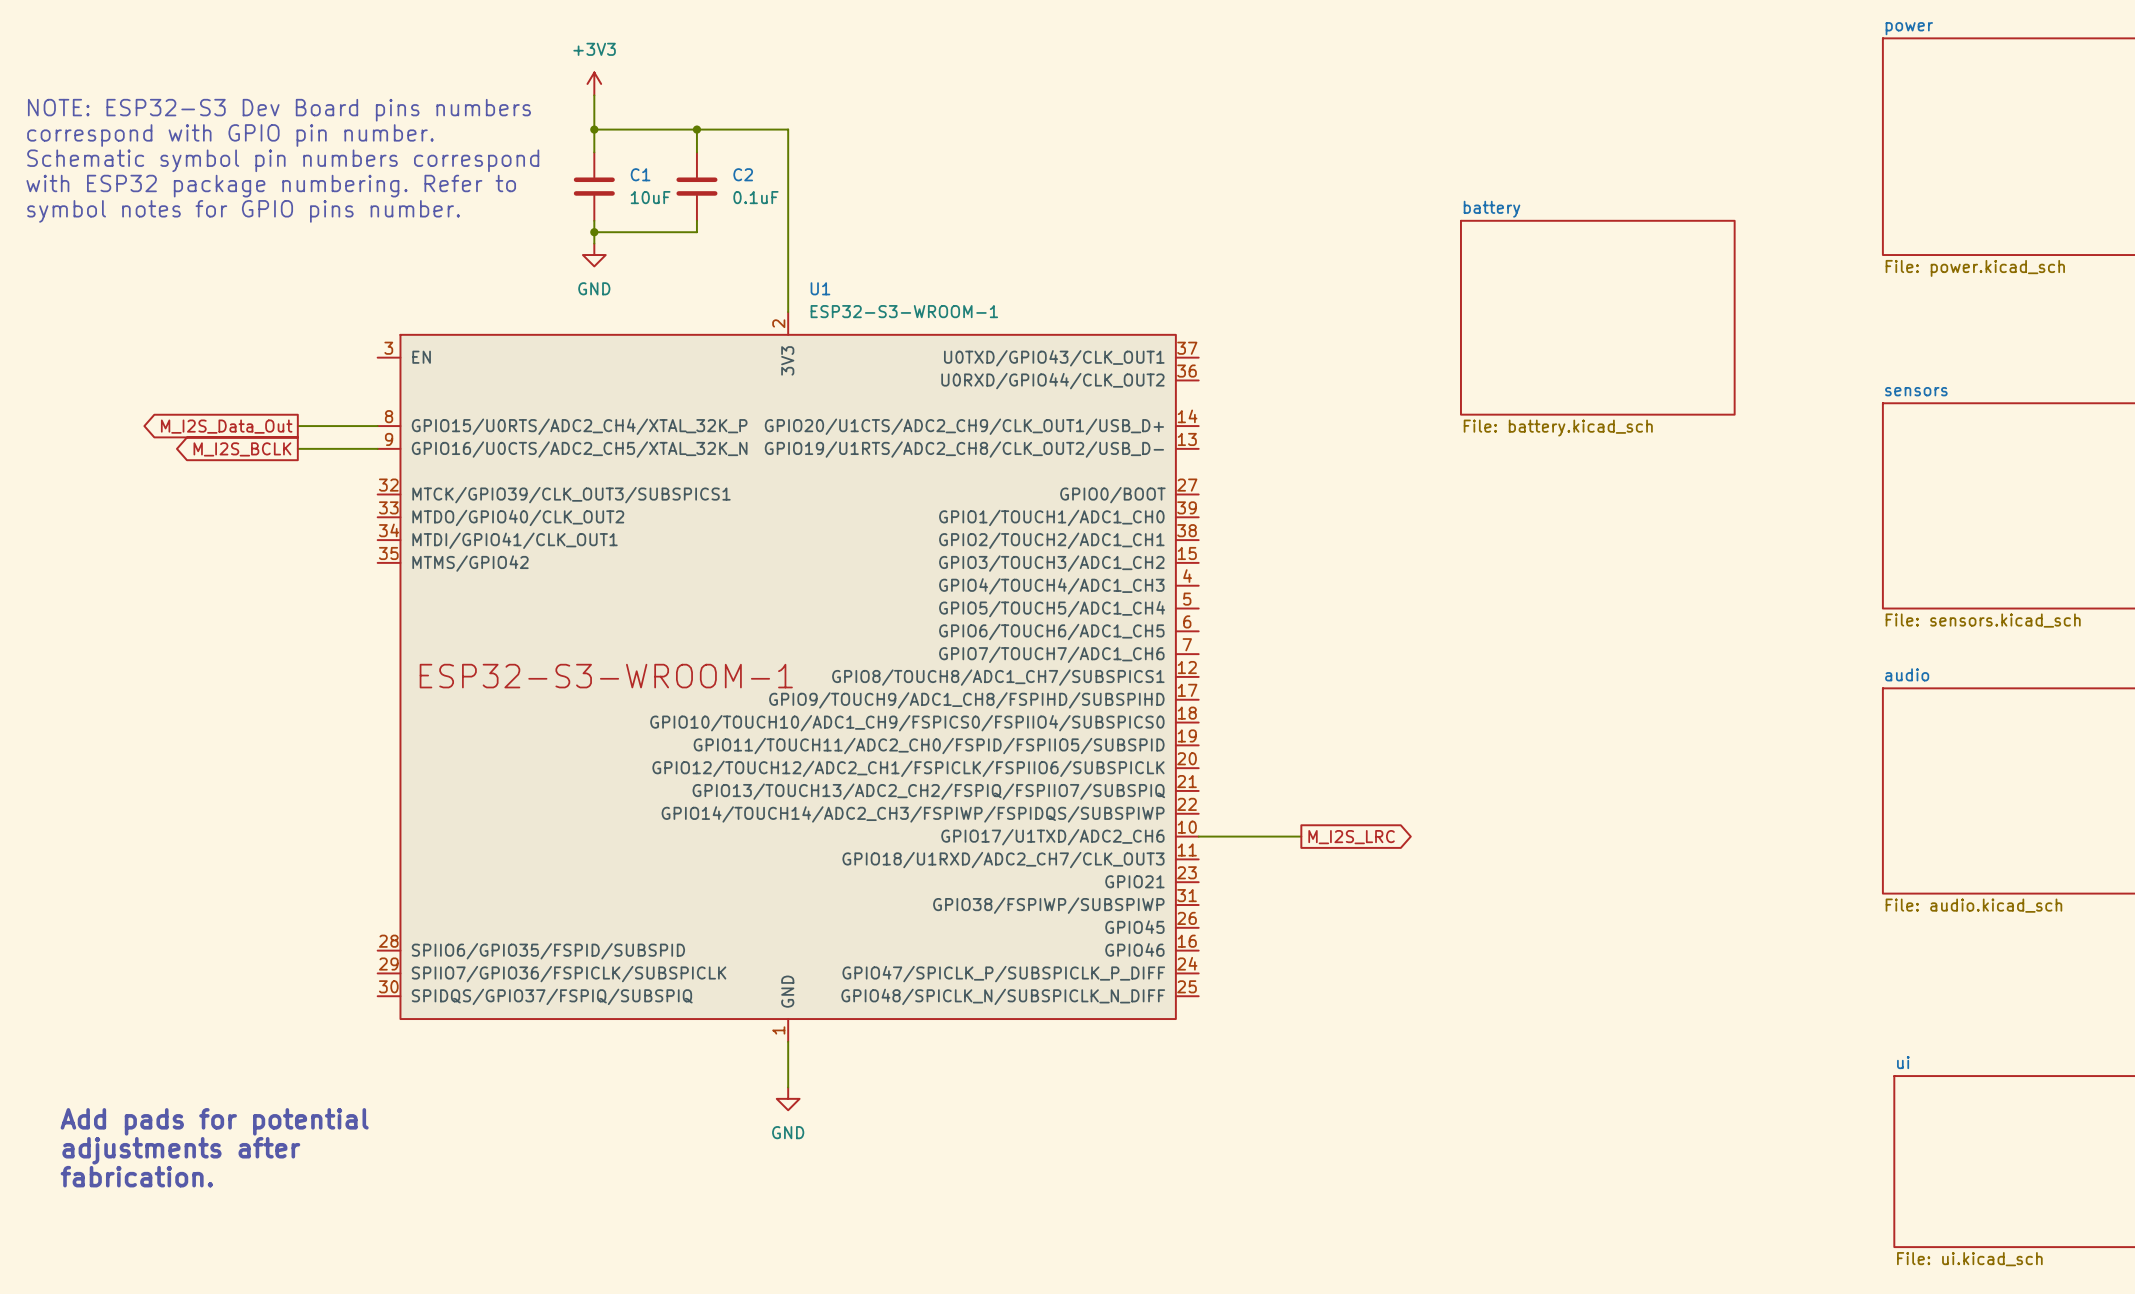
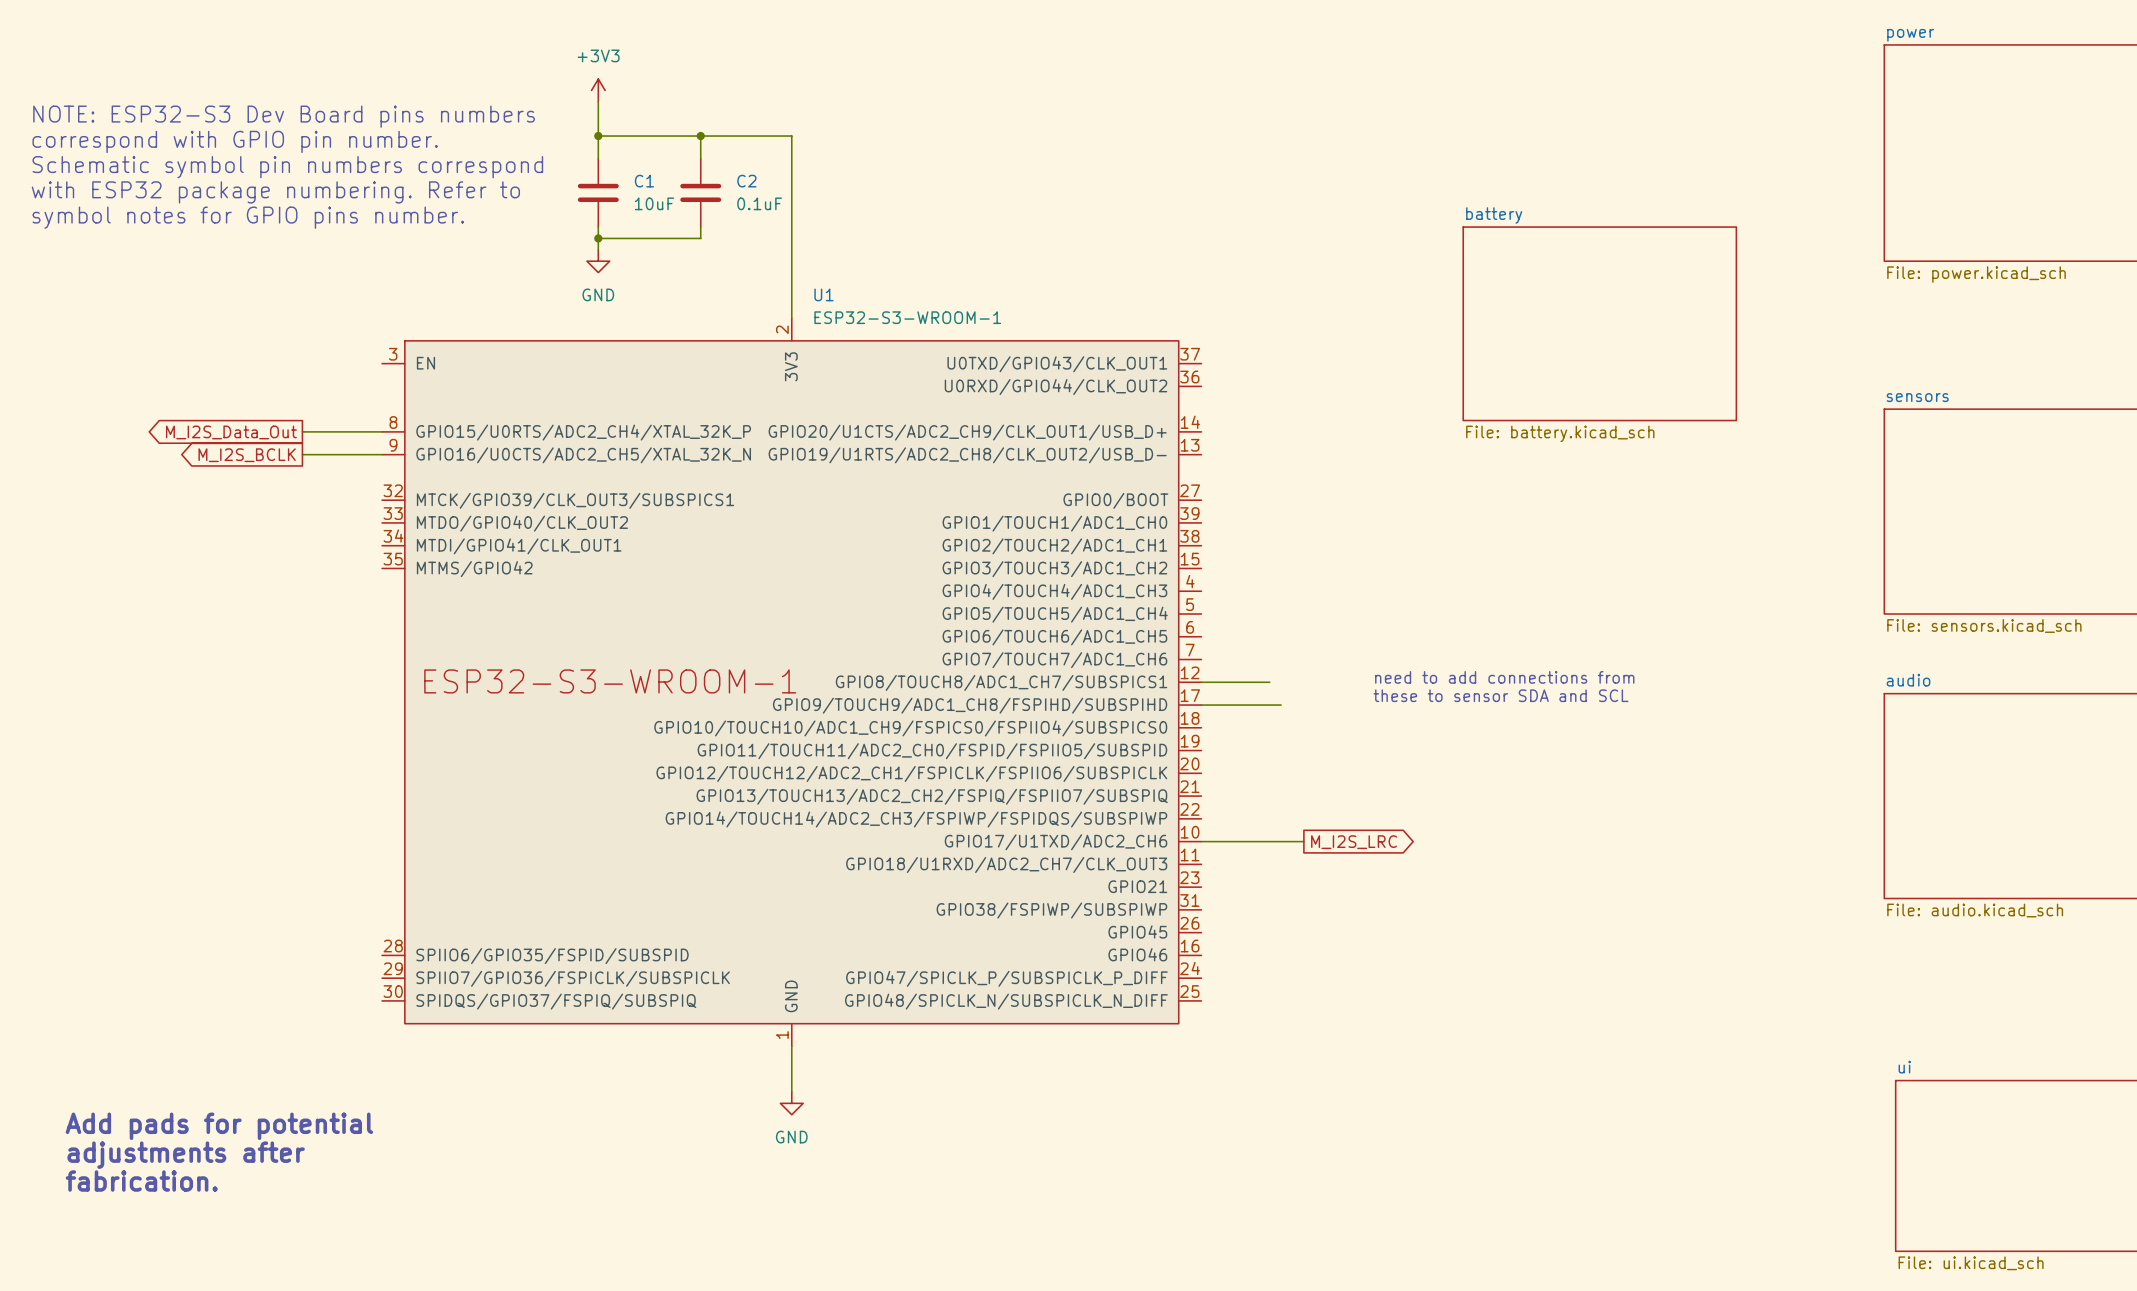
text: none -> need to add connections from (1504, 677)
wire: none -> (1201, 682) (1269, 682)
text: none -> these to sensor SDA and SCL (1500, 695)
wire: none -> (1201, 705) (1281, 705)

